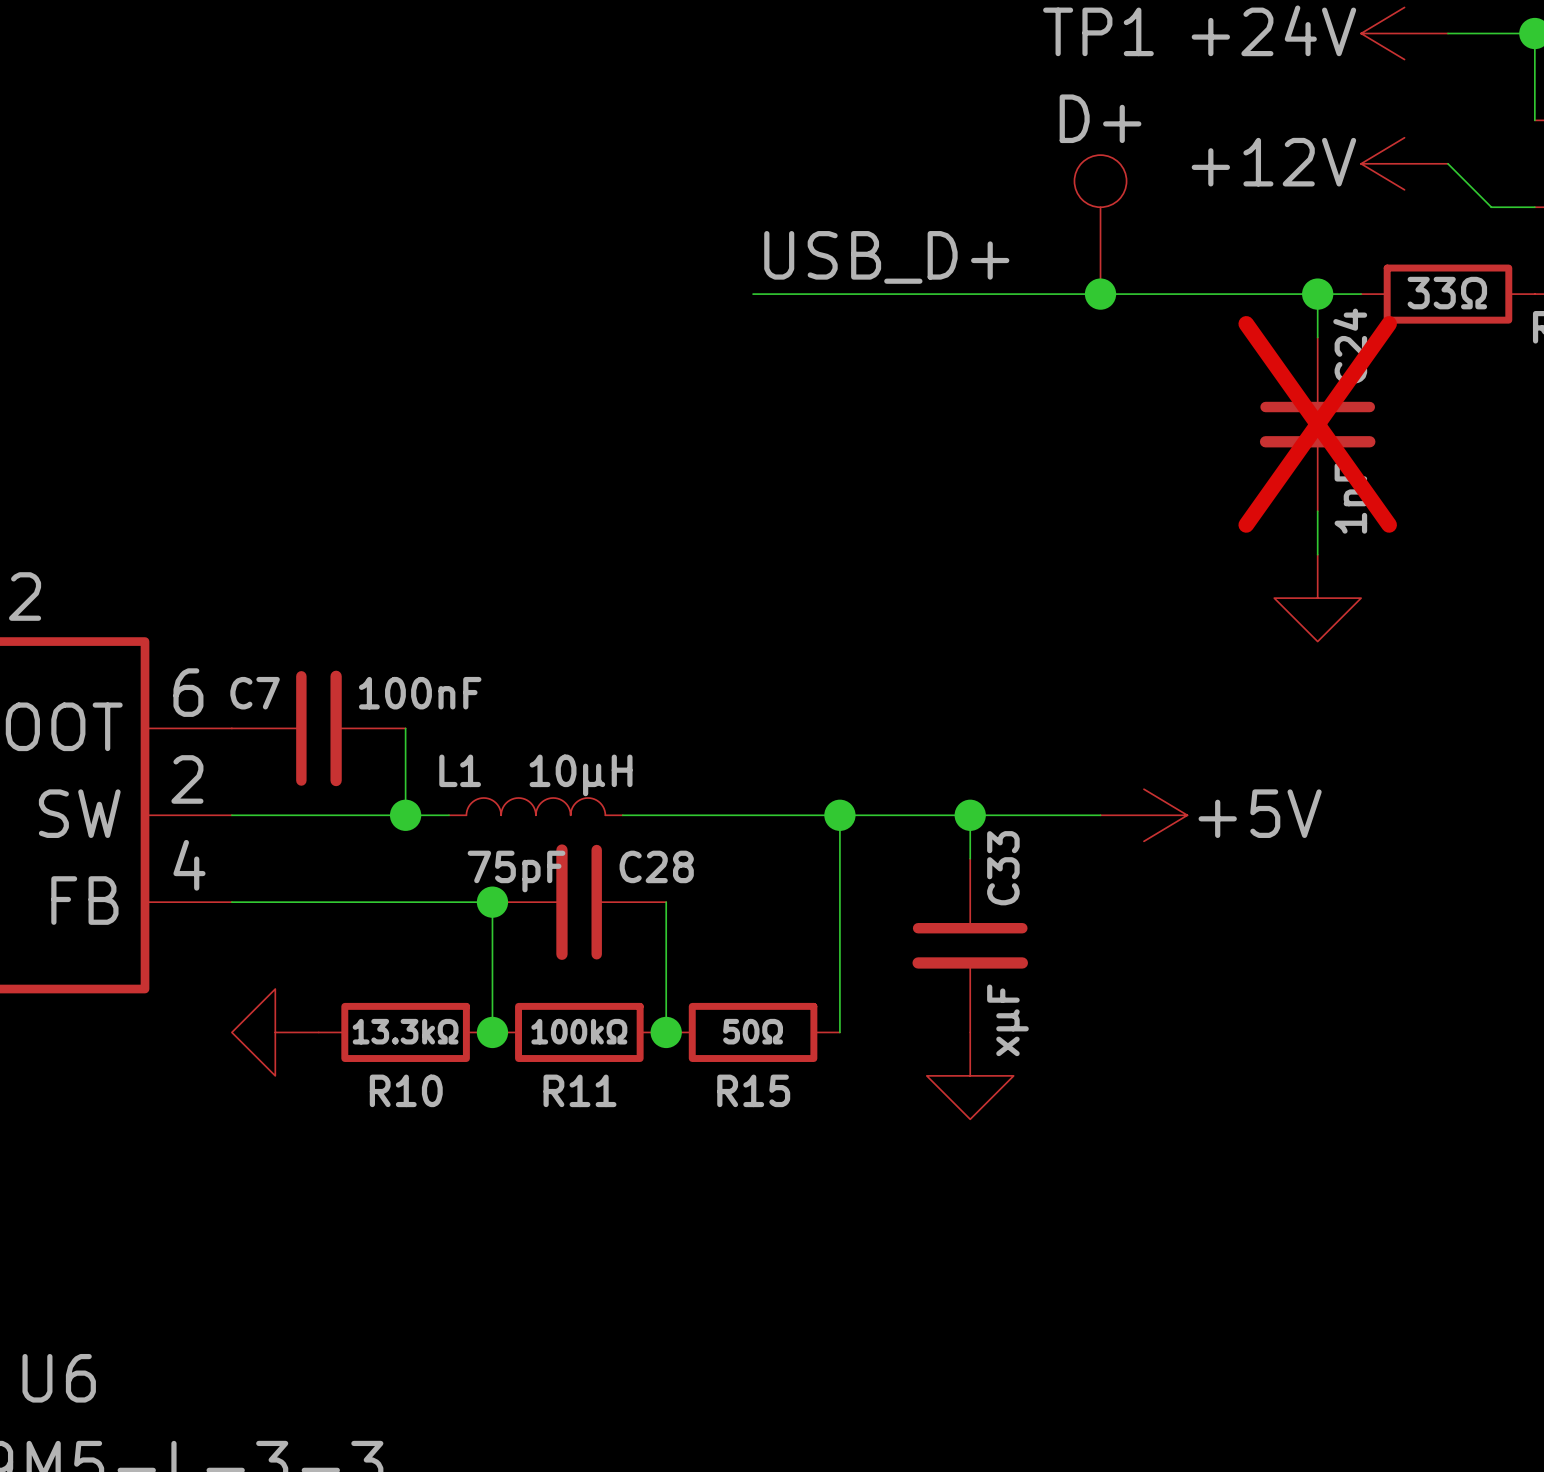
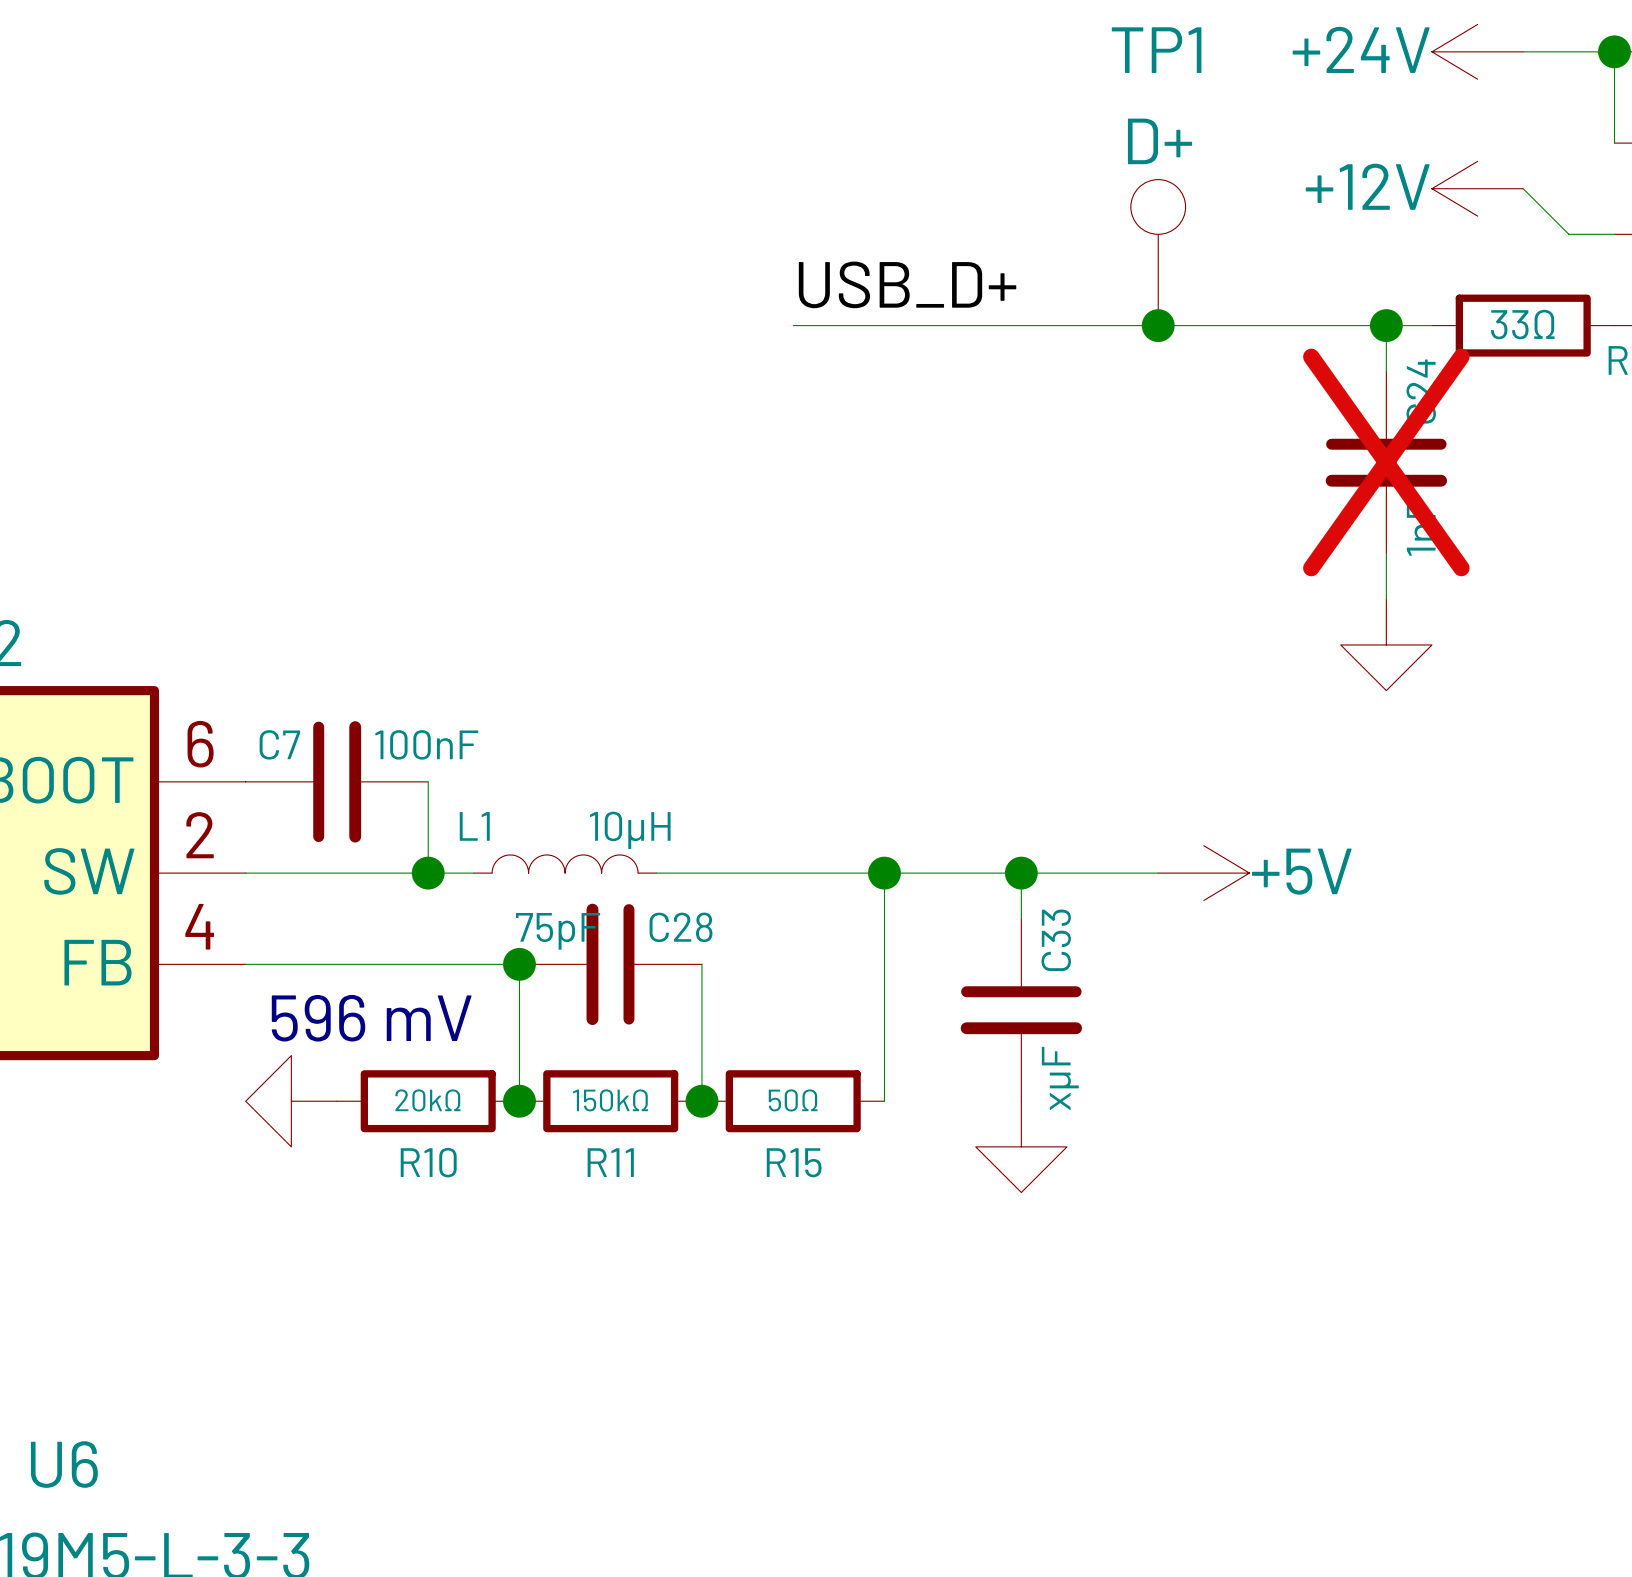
text: none -> 596 mV (371, 1018)
R10 value: 13.3kΩ (405, 1031) -> 20kΩ (427, 1100)
R11 value: 100kΩ (579, 1031) -> 150kΩ (610, 1100)

